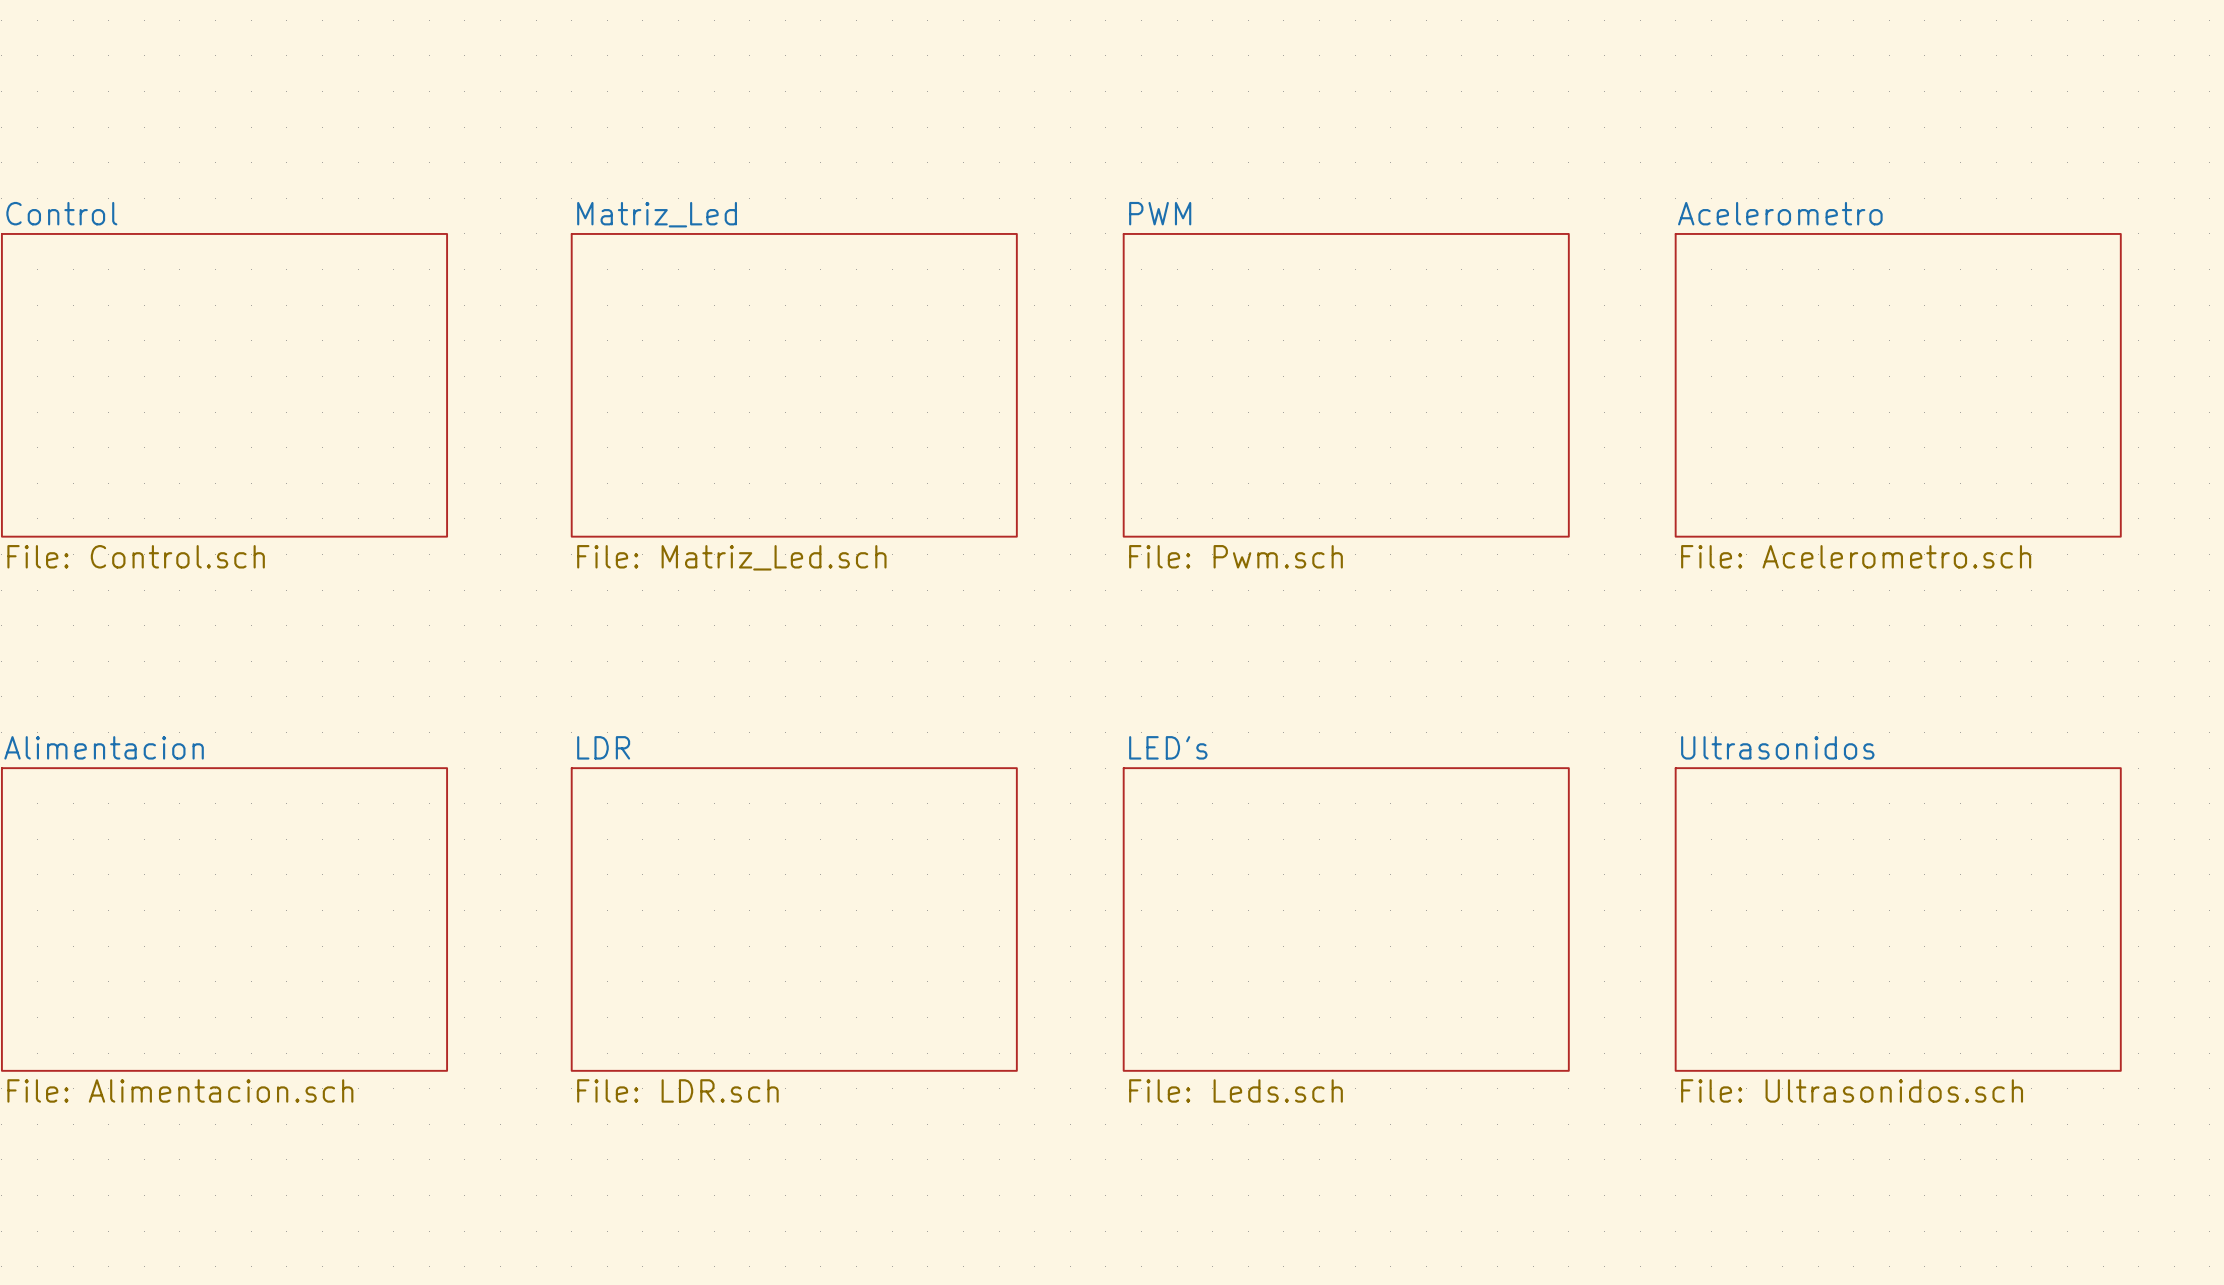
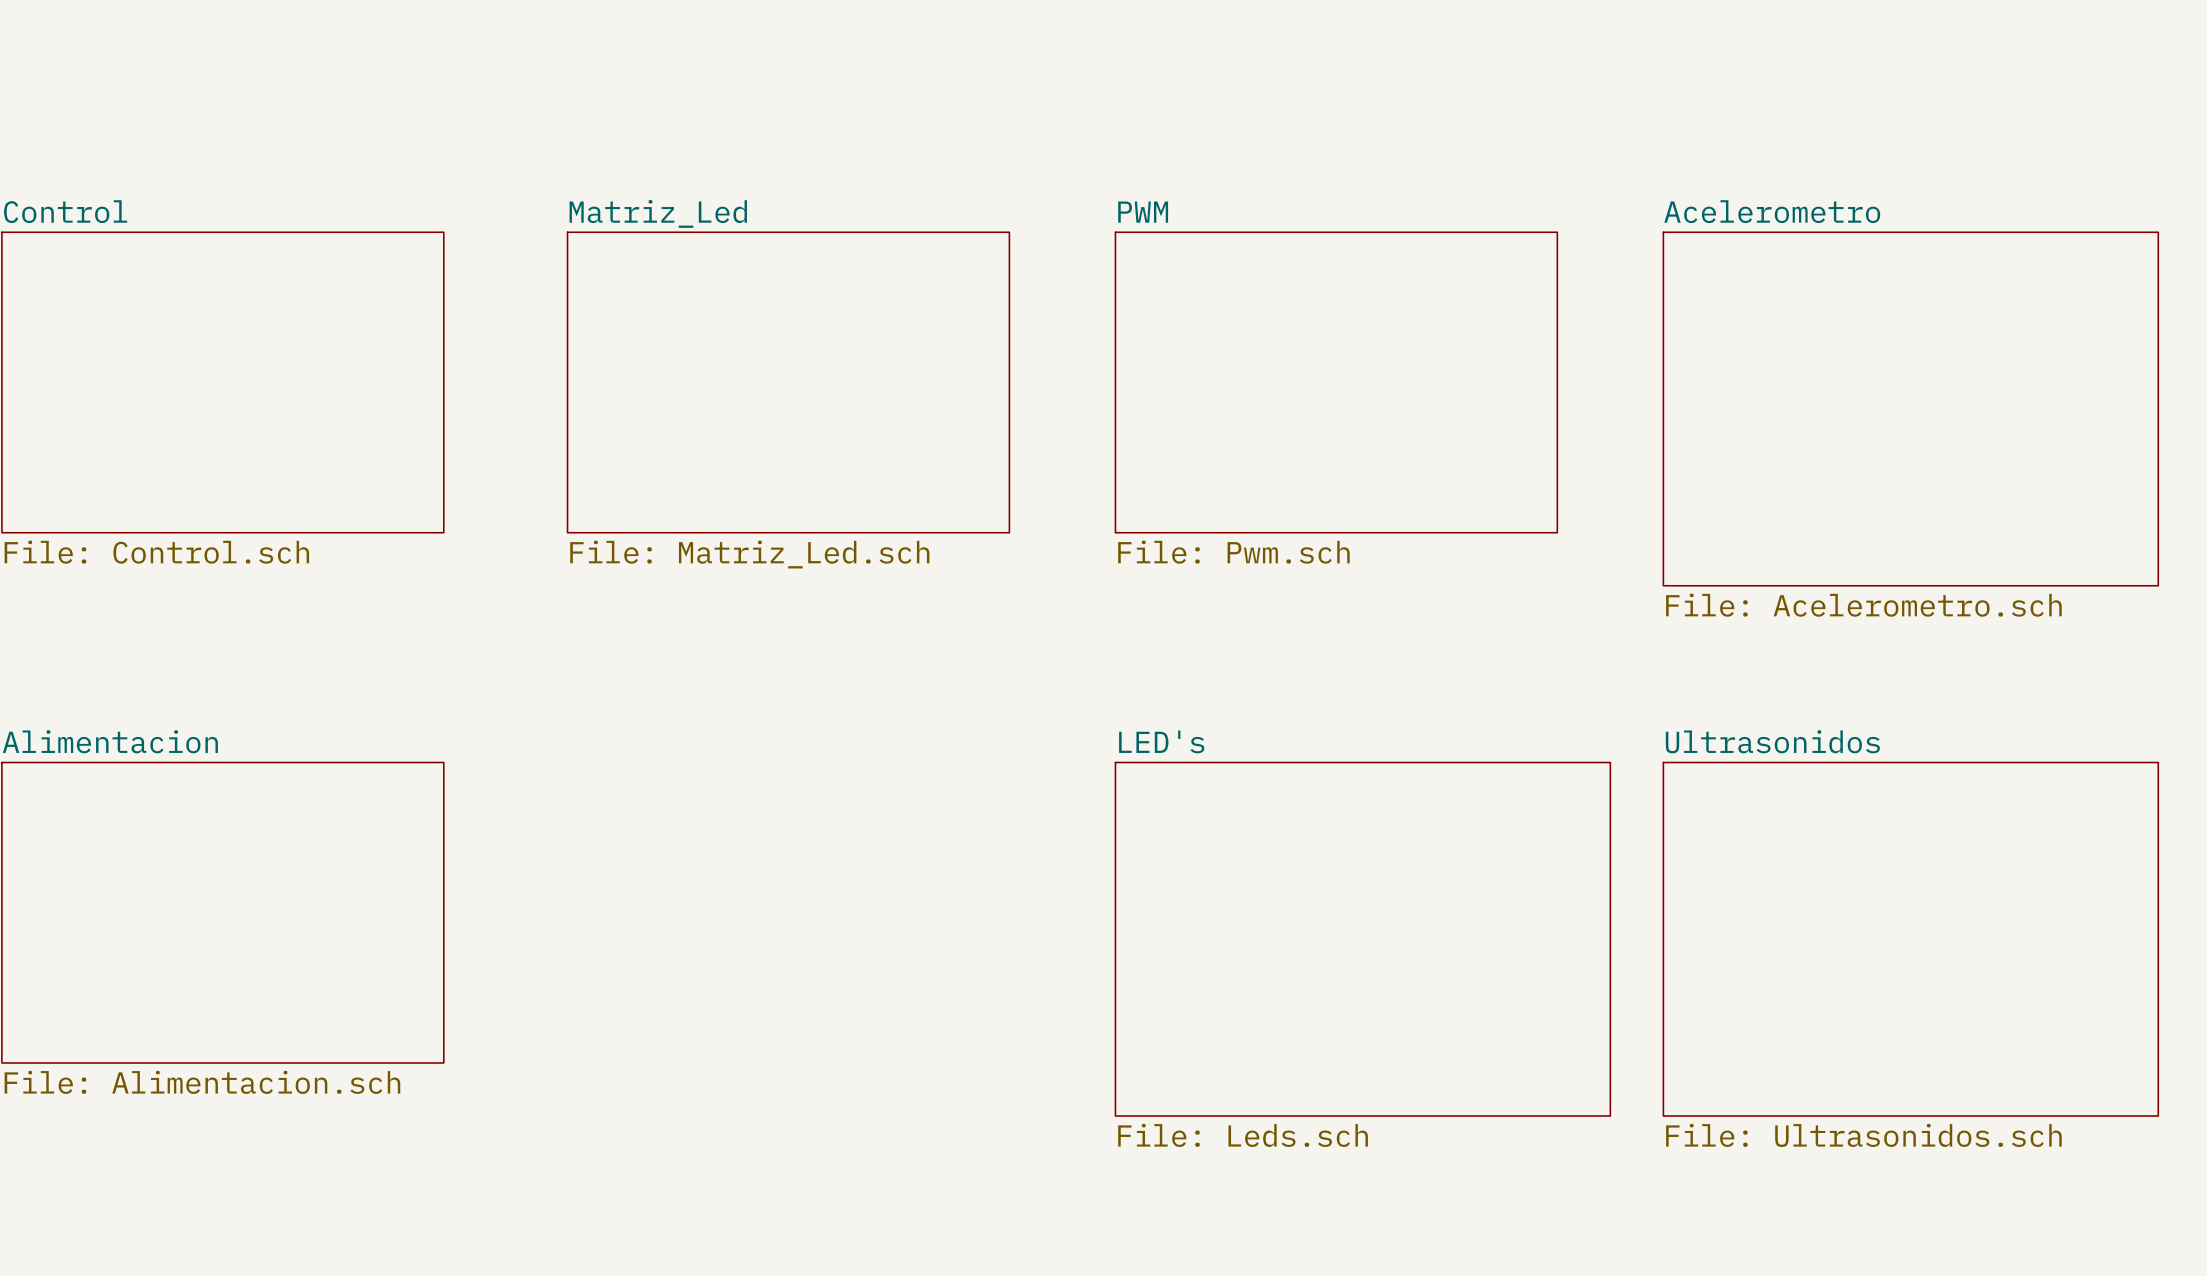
sheet Acelerometro: File: Acelerometro.sch (1898, 385) -> none
sheet Acelerometro: none -> File: Acelerometro.sch (1910, 409)
sheet LDR: File: LDR.sch (794, 919) -> none
sheet LED's: File: Leds.sch (1346, 919) -> none
sheet Ultrasonidos: File: Ultrasonidos.sch (1898, 919) -> none
sheet LED's: none -> File: Leds.sch (1362, 939)
sheet Ultrasonidos: none -> File: Ultrasonidos.sch (1910, 939)

